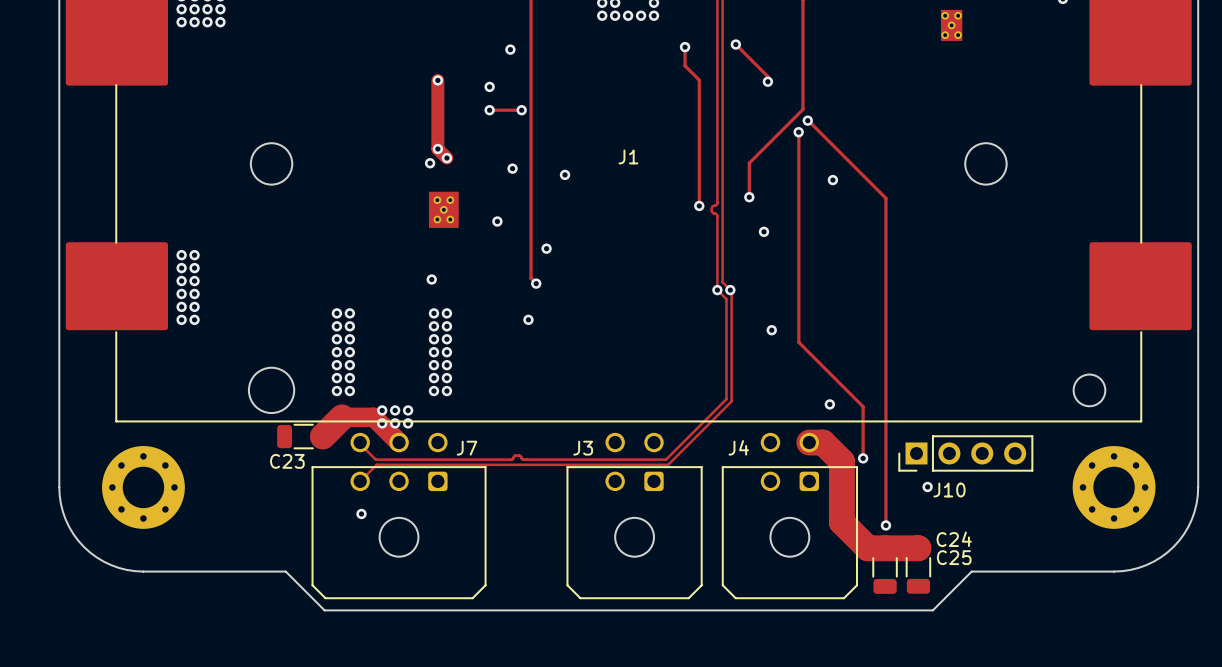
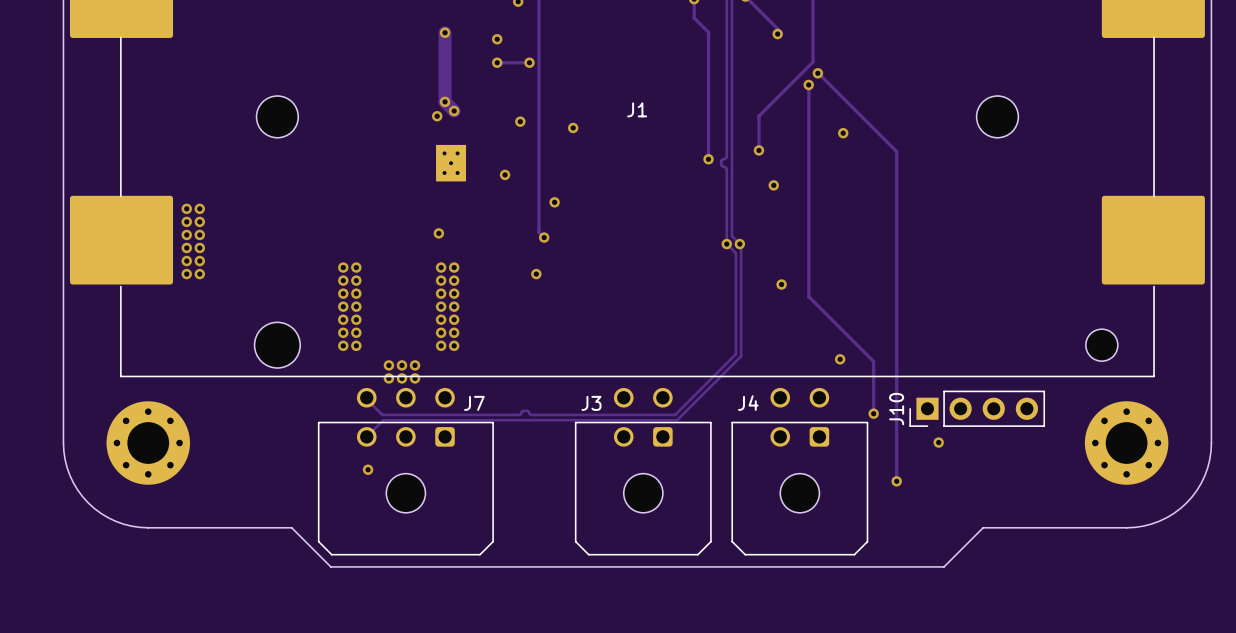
C23: (303, 436) -> none
track: (322, 436) (342, 417) (373, 417) (399, 442) -> none
track: (809, 442) (823, 442) (841, 461) (841, 522) (867, 548) (918, 548) -> none
J10 name rotation: 0° (949, 490) -> 90° counterclockwise (896, 409)
J10 name position: J10 (949, 490) -> J10 (896, 409)
C24: (885, 567) -> none
C25: (918, 567) -> none

